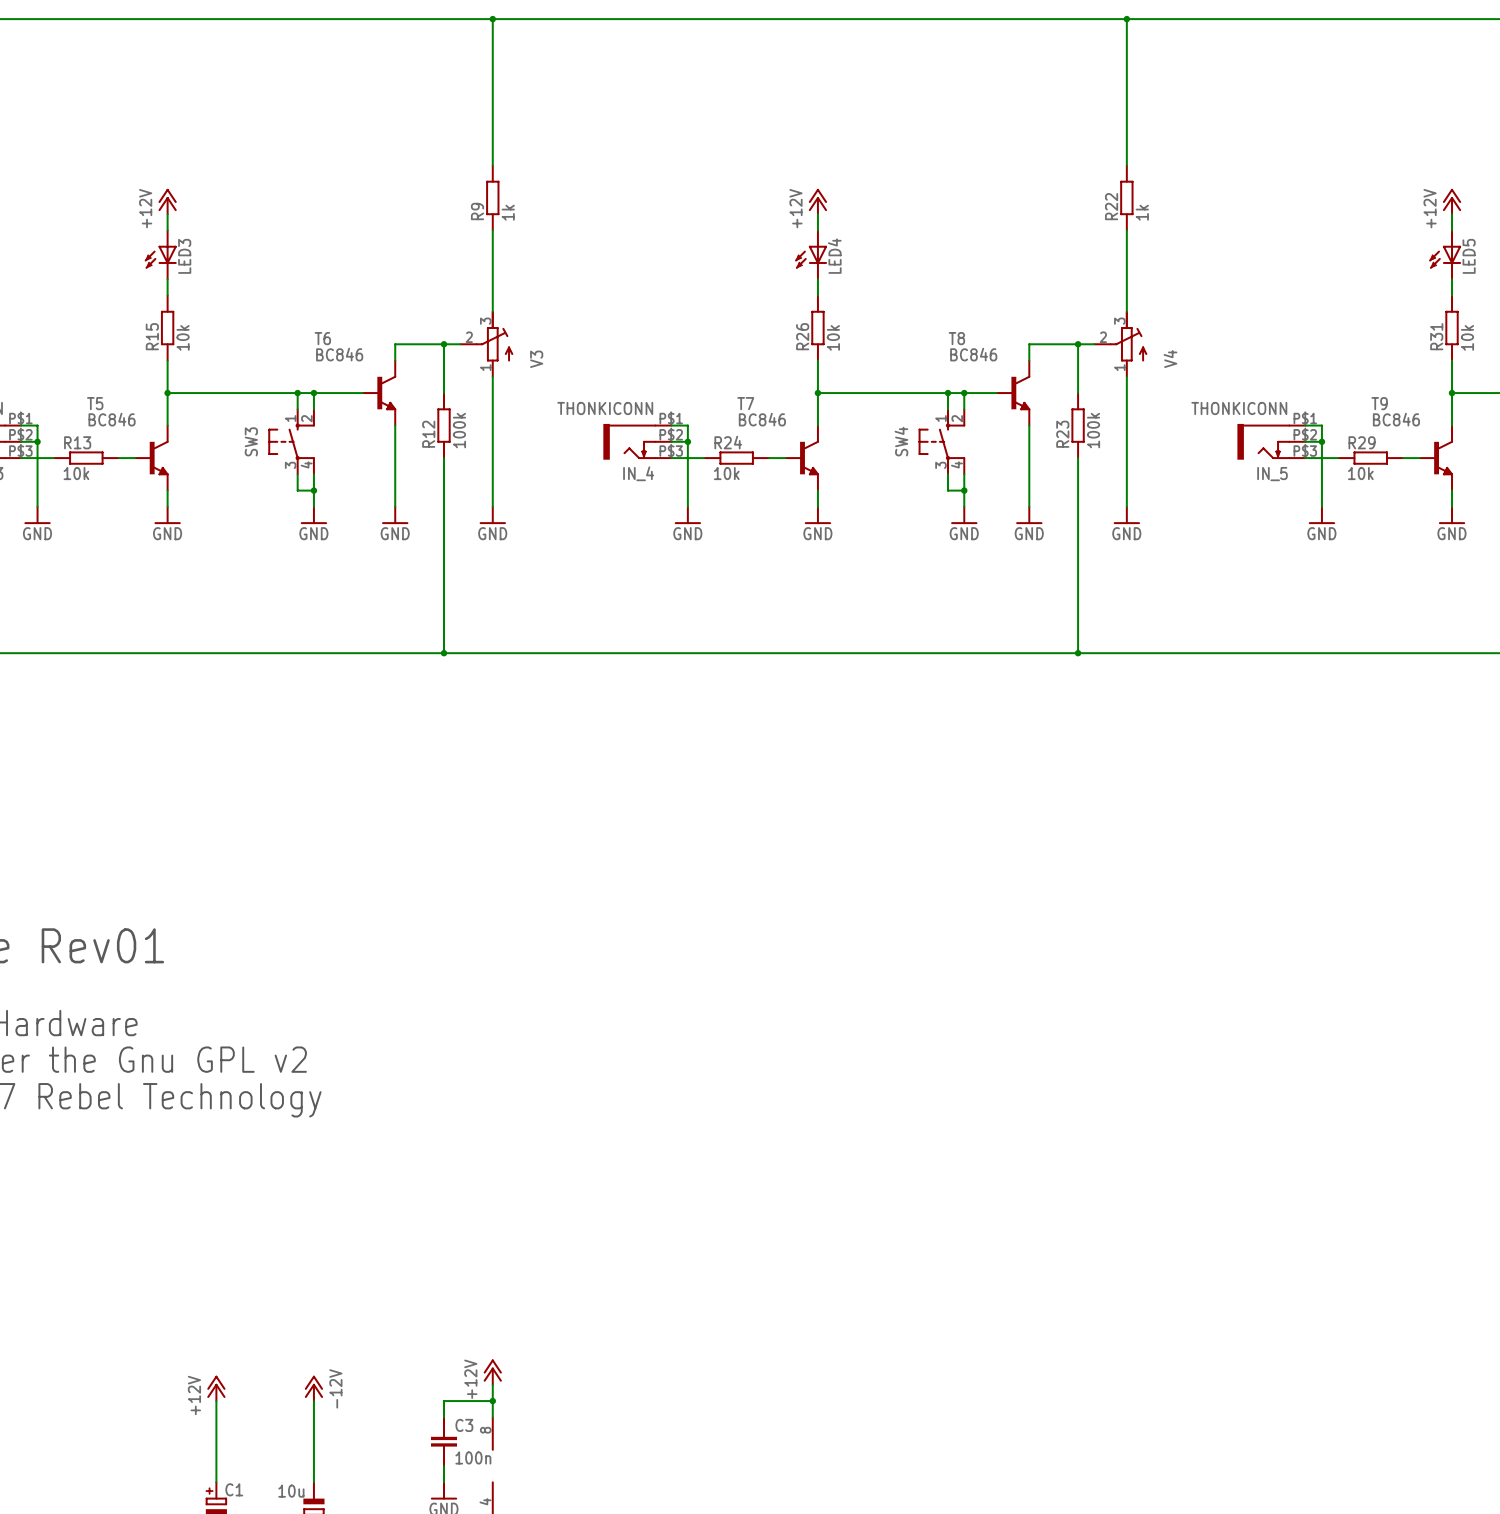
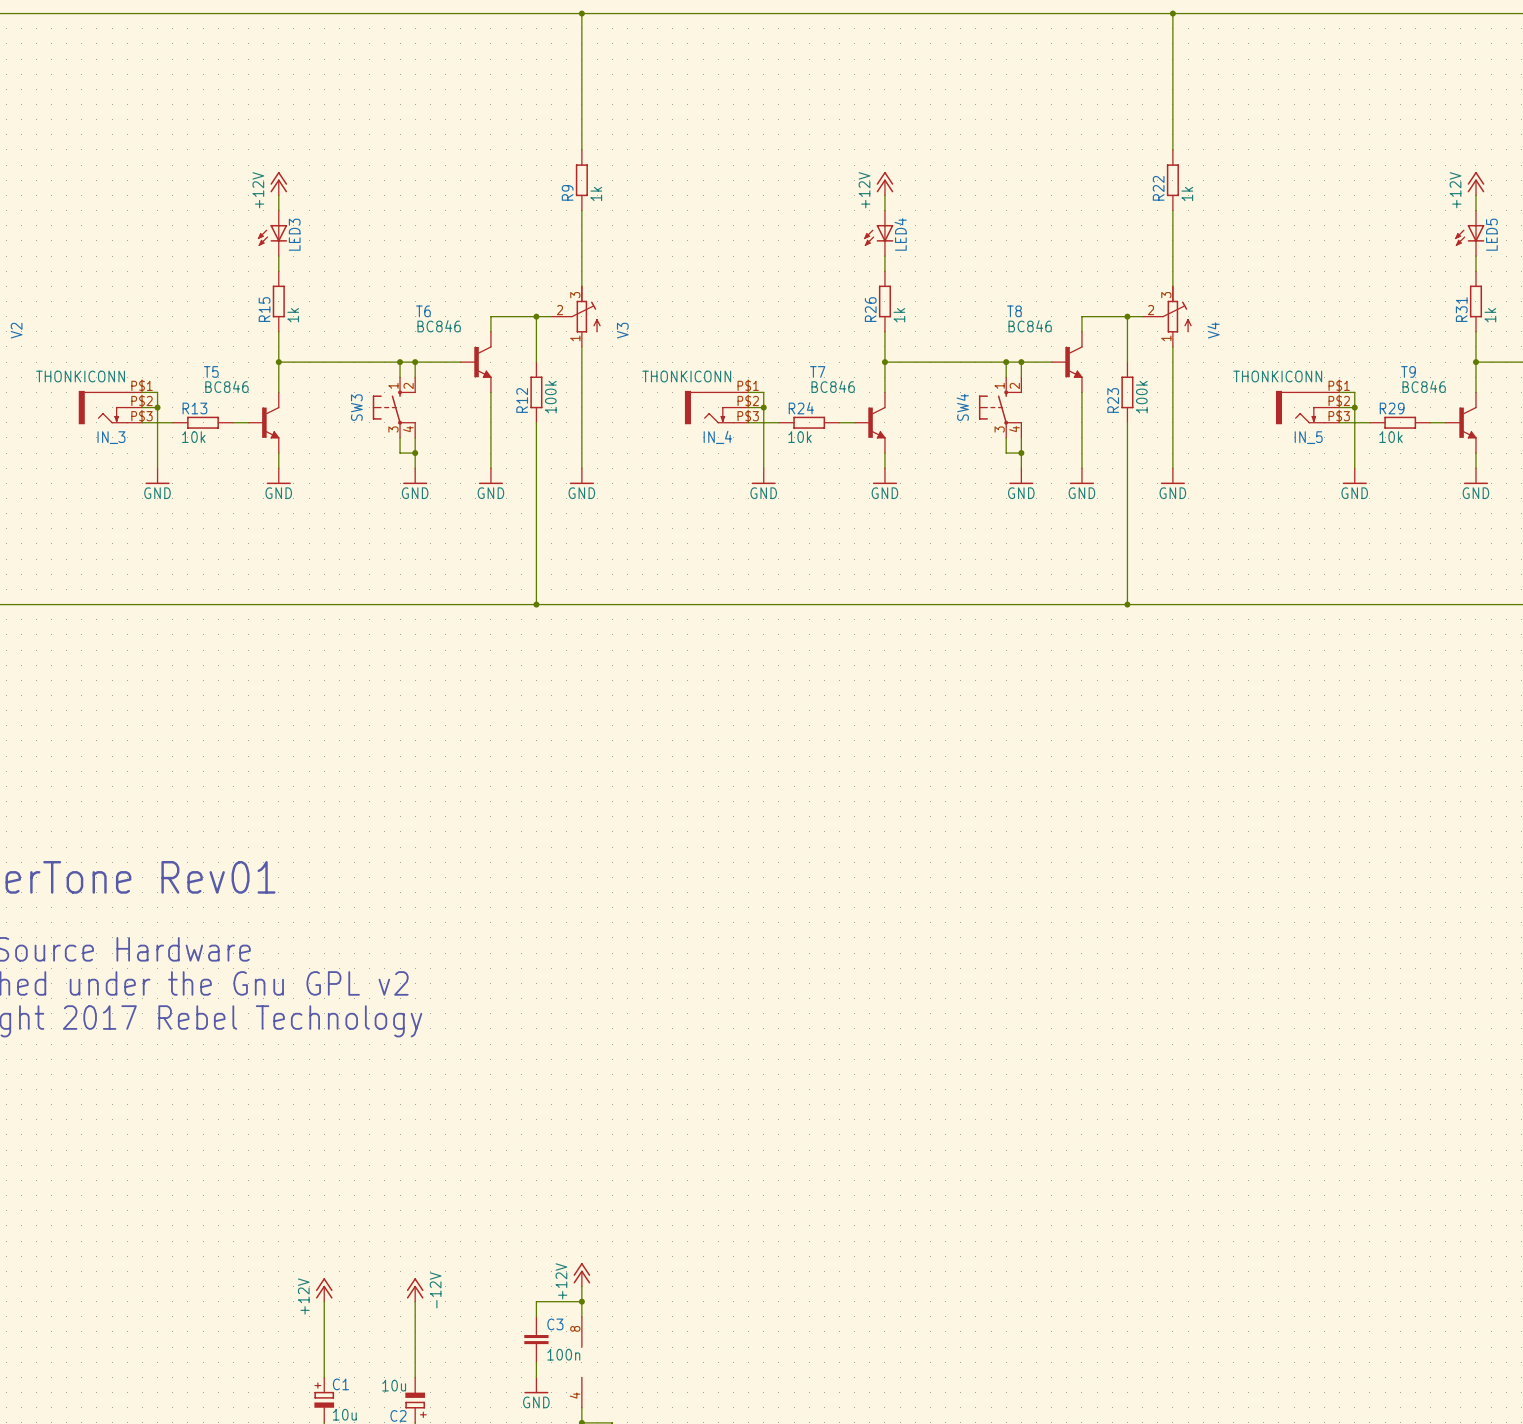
R15 value: 10k (183, 337) -> 1k (293, 315)
R26 value: 10k (833, 337) -> 1k (899, 315)
R31 value: 10k (1467, 337) -> 1k (1490, 315)

